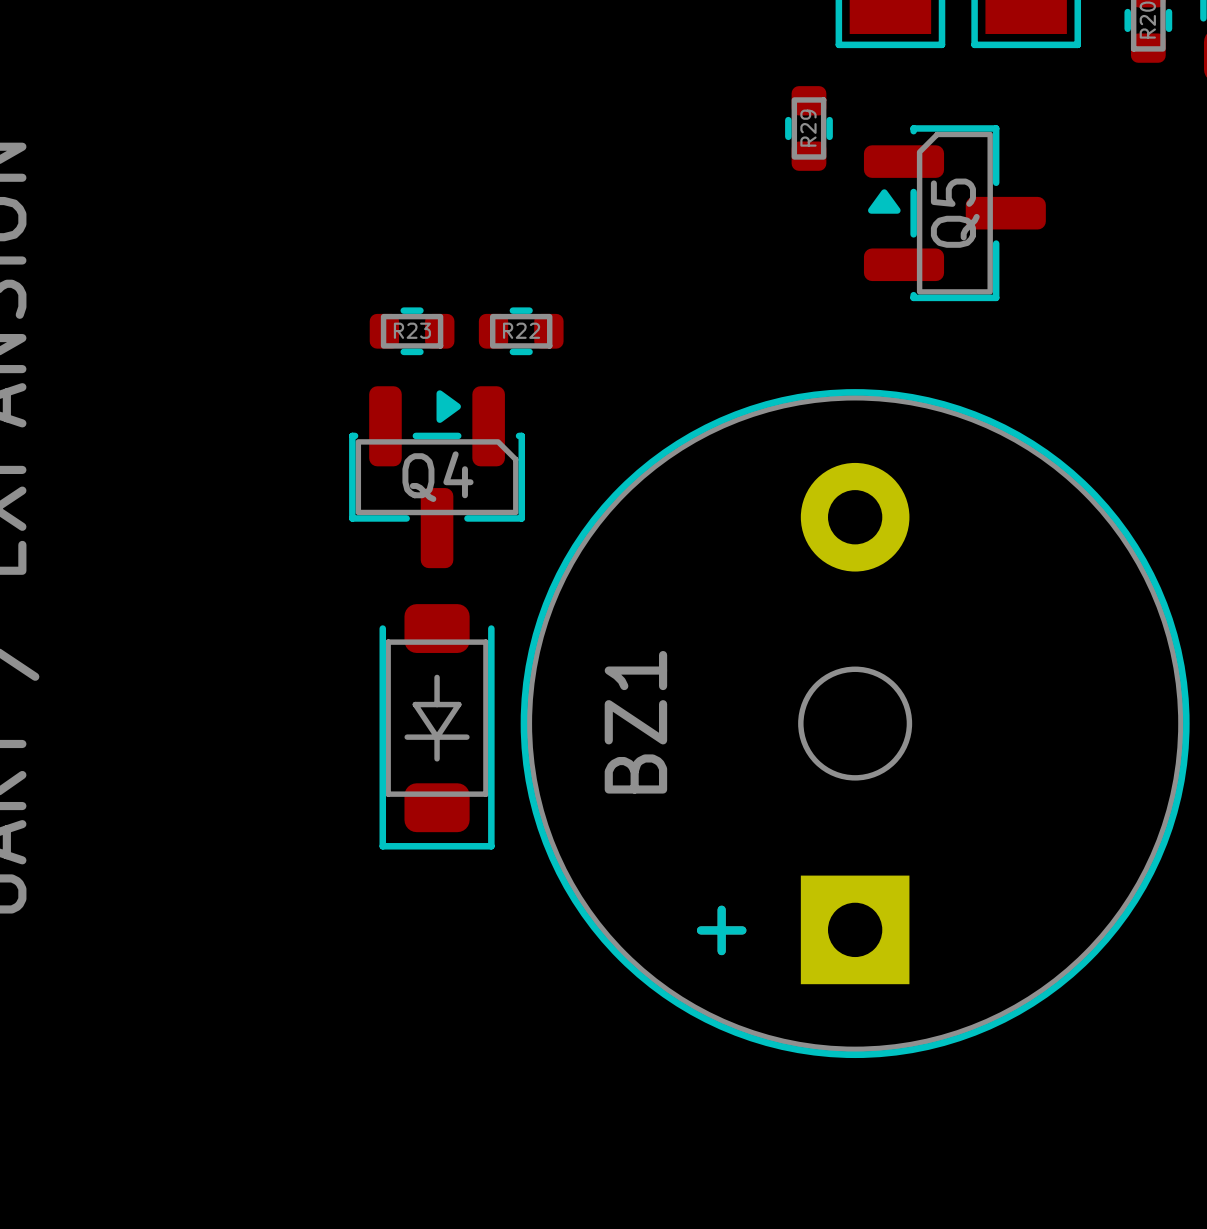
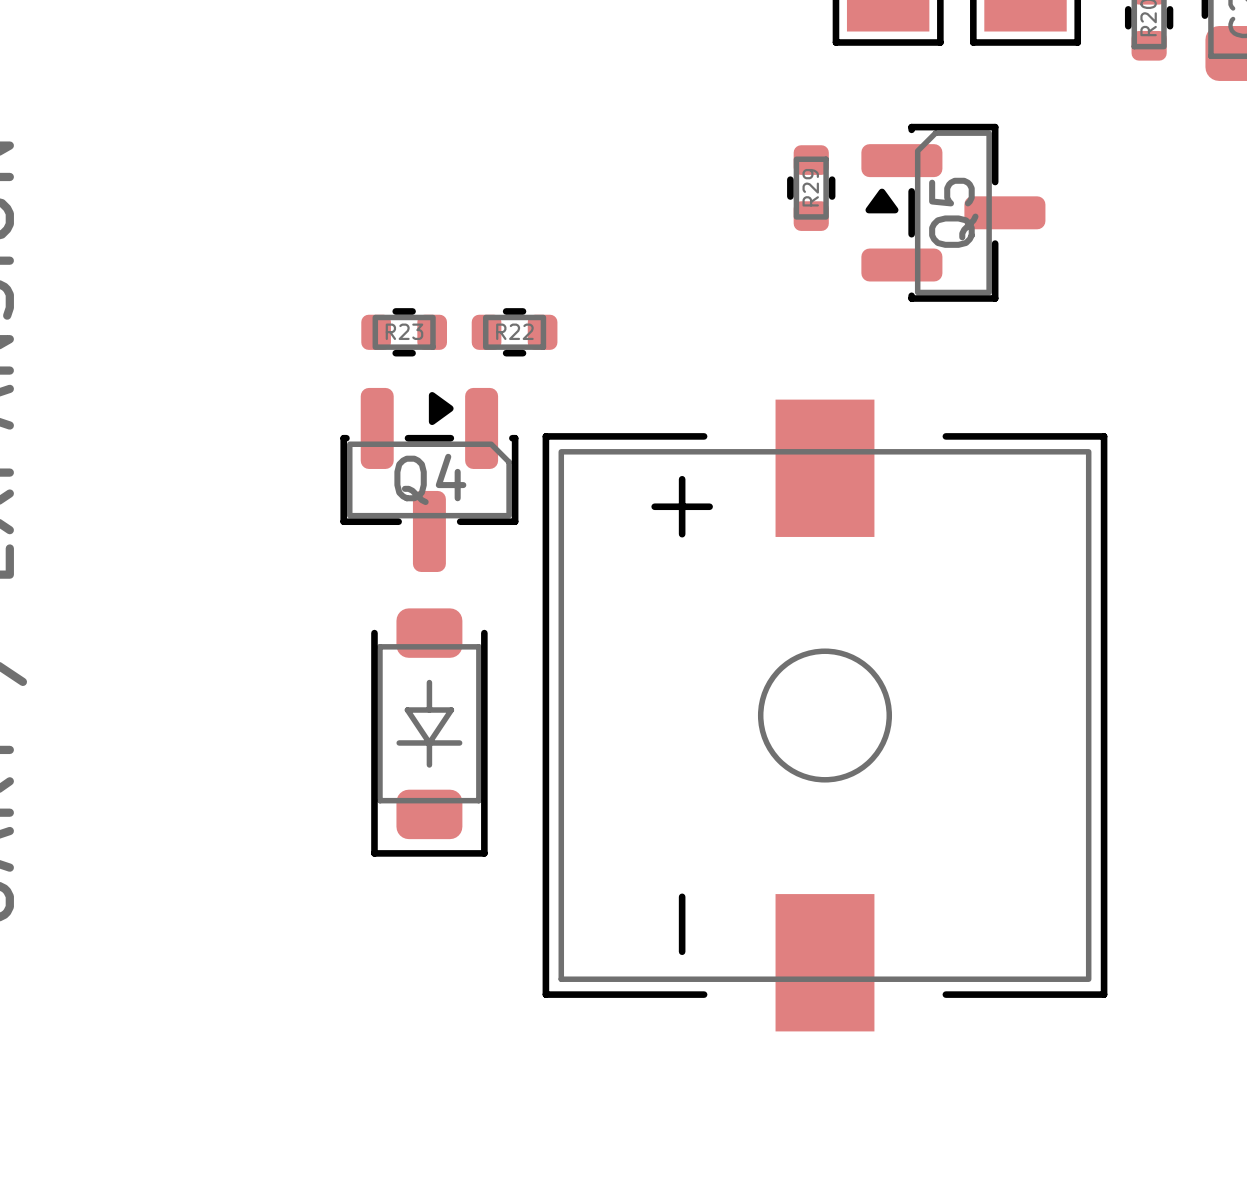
R29 position: (808, 128) -> (811, 188)
part: none -> (824, 715)
BZ1: (855, 723) -> none

